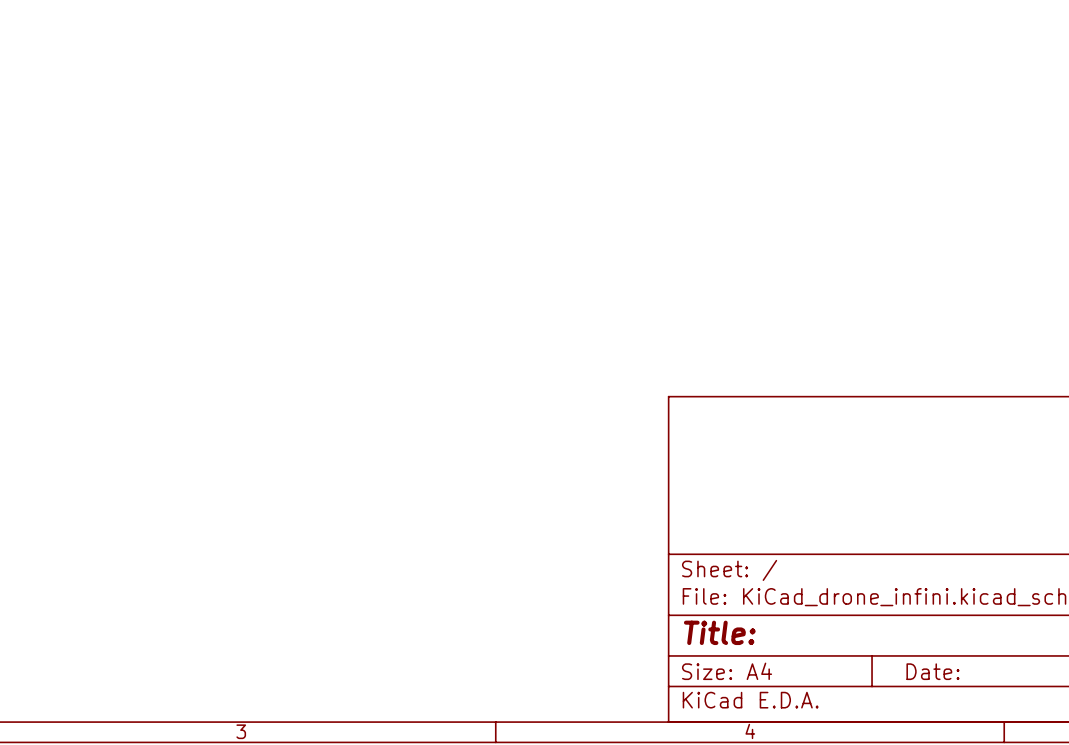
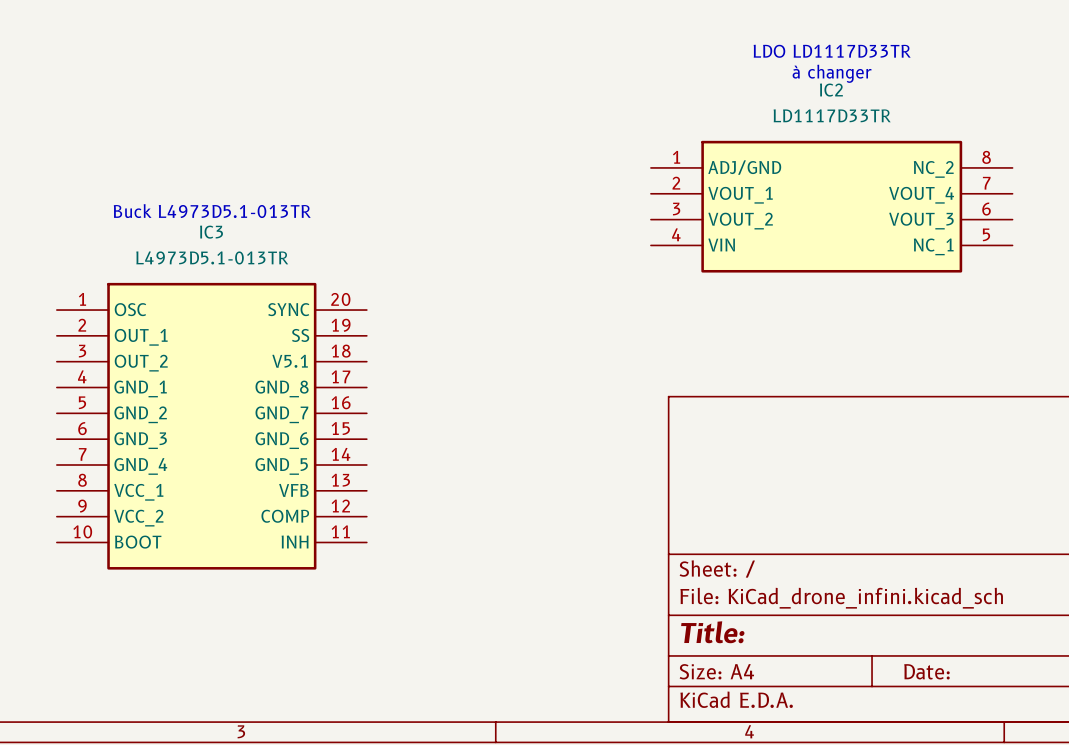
text: none -> LDO LD1117D33TR (832, 51)
text: none -> à changer (832, 73)
IC2: none -> LD1117D33TR (831, 206)
text: none -> Buck L4973D5.1-013TR (212, 211)
IC3: none -> L4973D5.1-013TR (211, 426)

